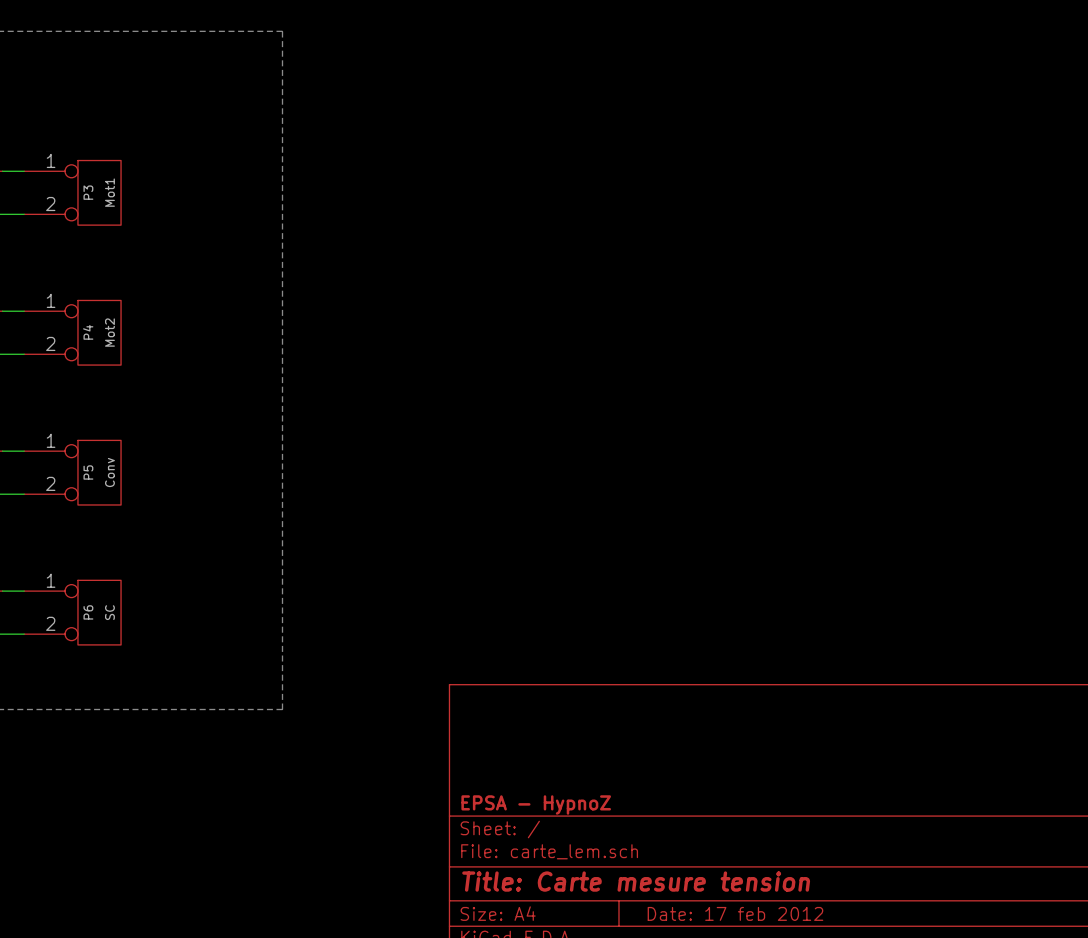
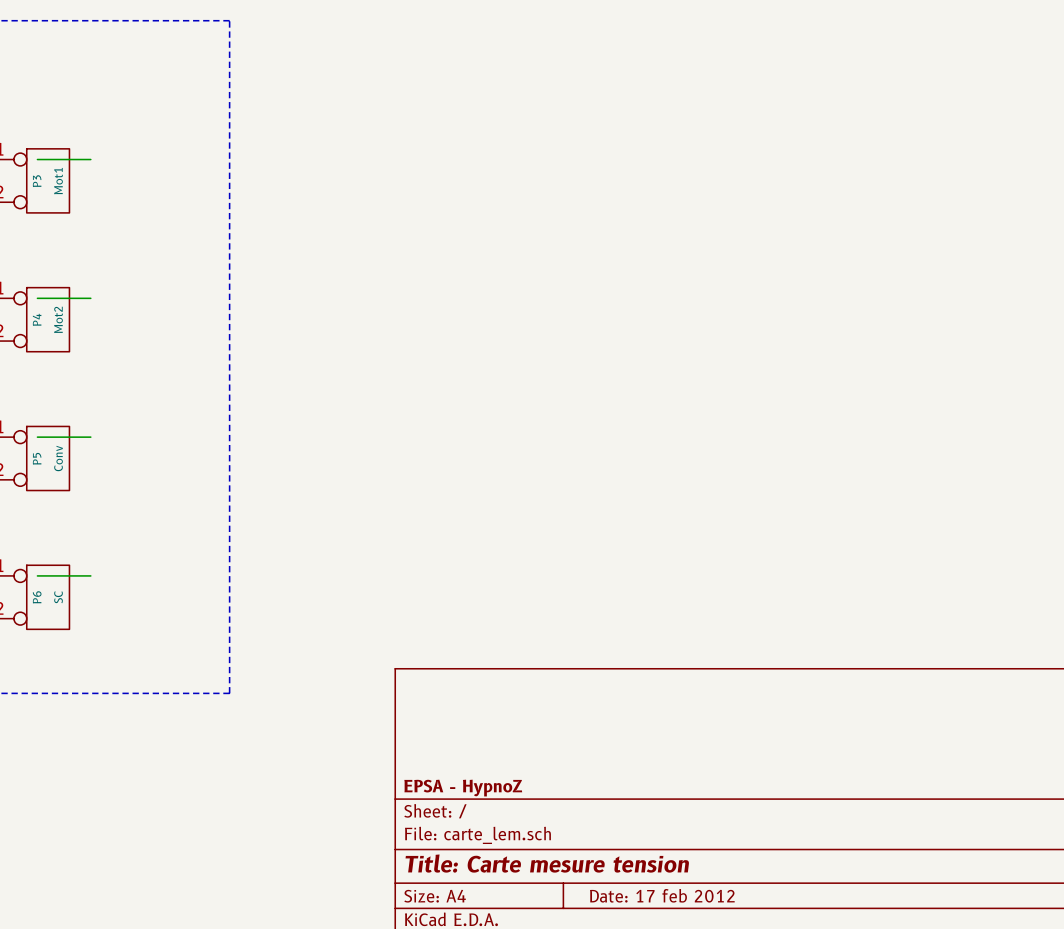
wire: none -> (37, 159) (90, 159)
wire: none -> (37, 298) (90, 298)
wire: none -> (37, 437) (90, 437)
wire: none -> (37, 575) (90, 575)

